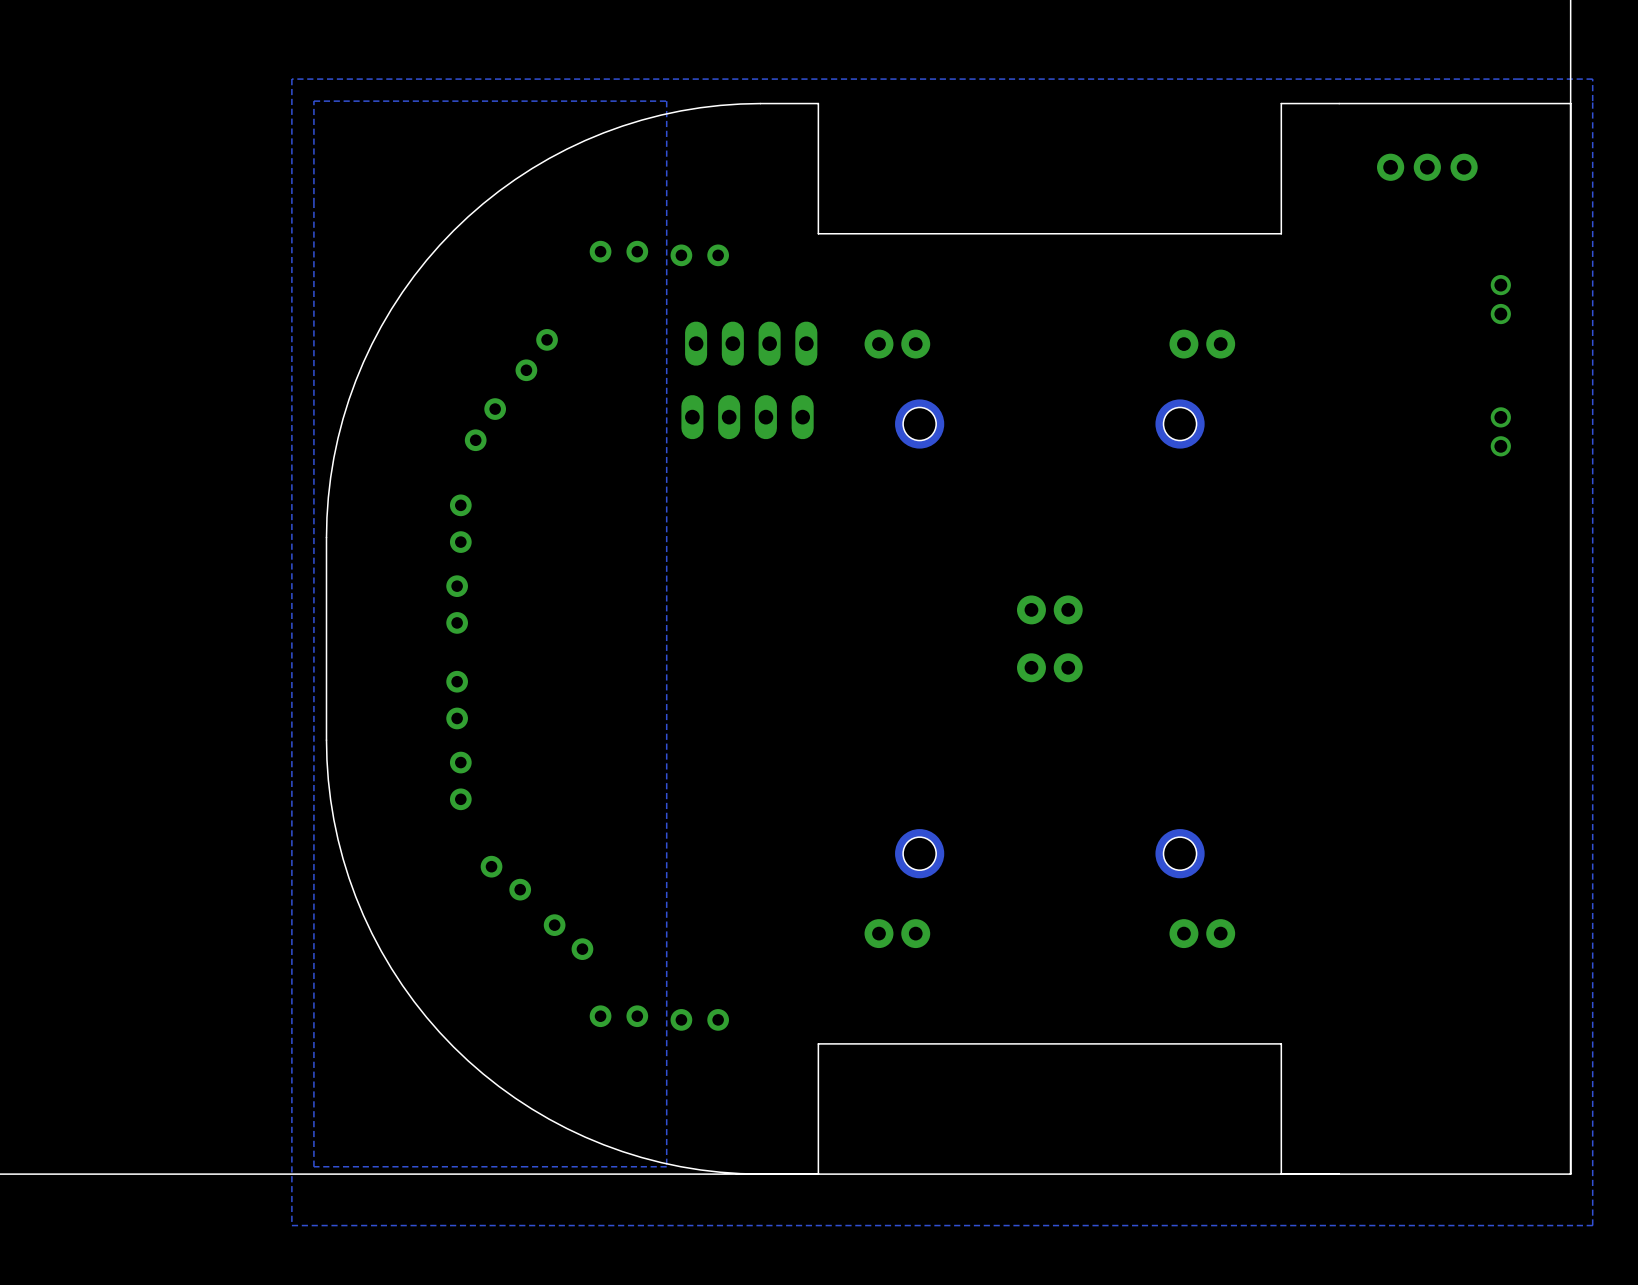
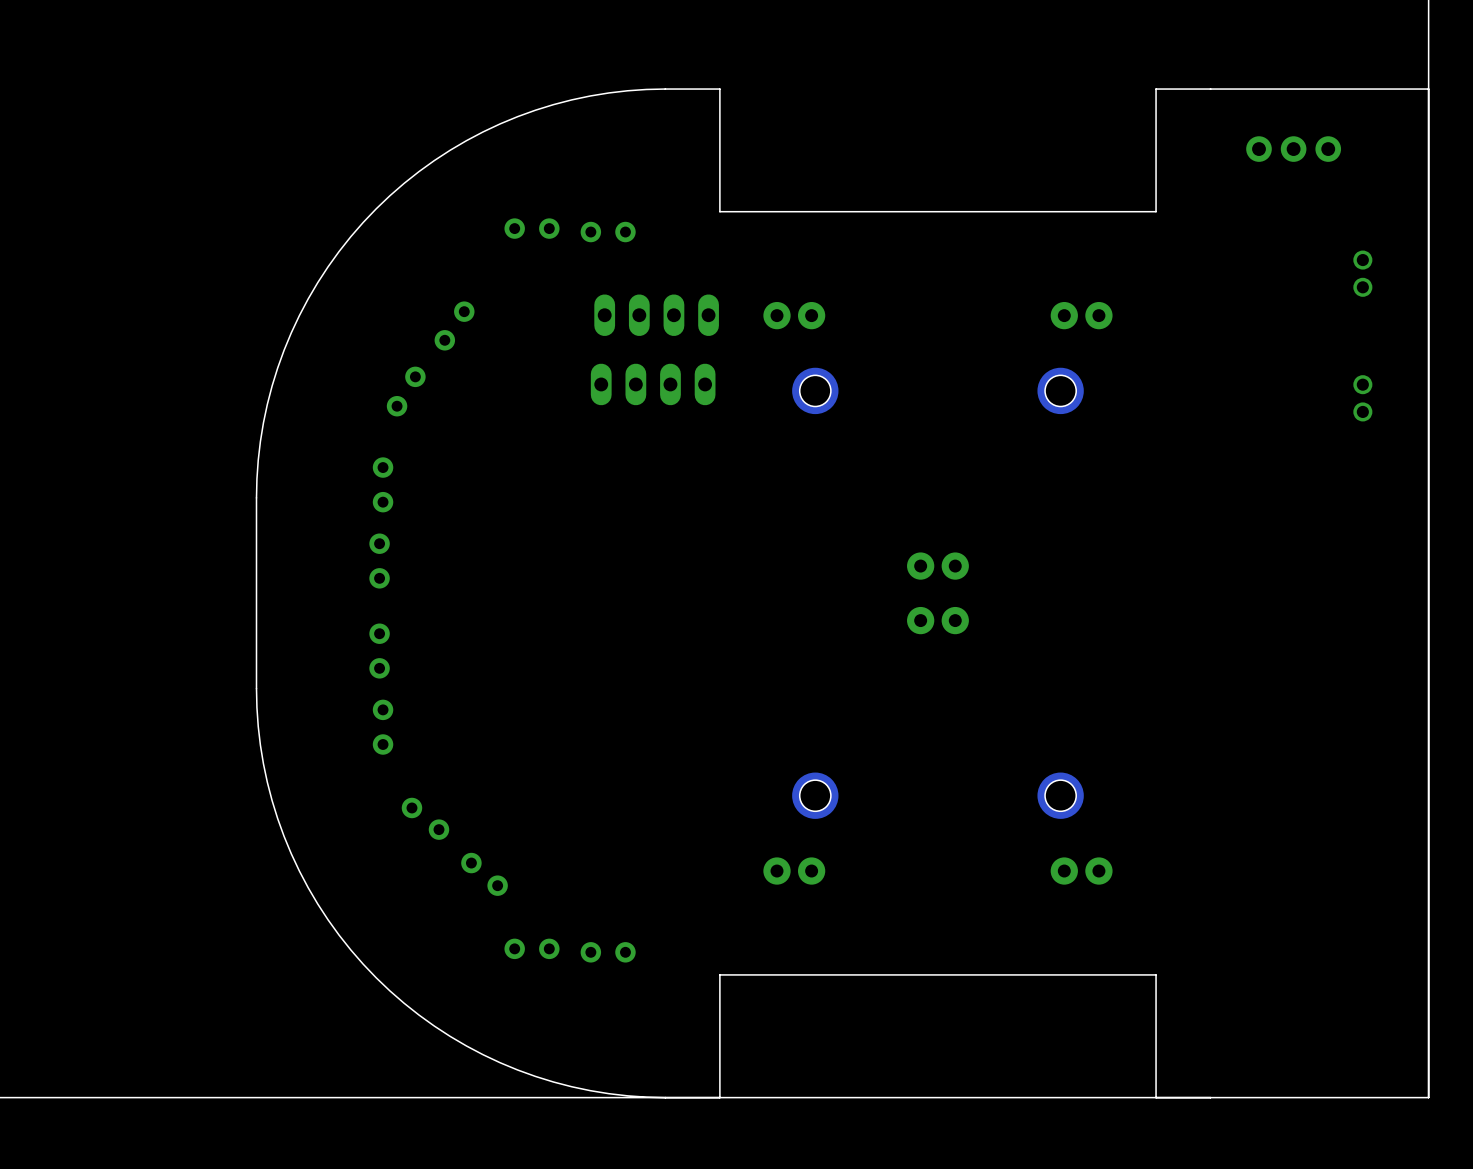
zone outline: (1592, 79) (291, 79) (291, 1225) (1592, 1225) (1592, 79) -> none
zone outline: (666, 101) (666, 1166) (313, 1166) (313, 101) (666, 101) -> none

